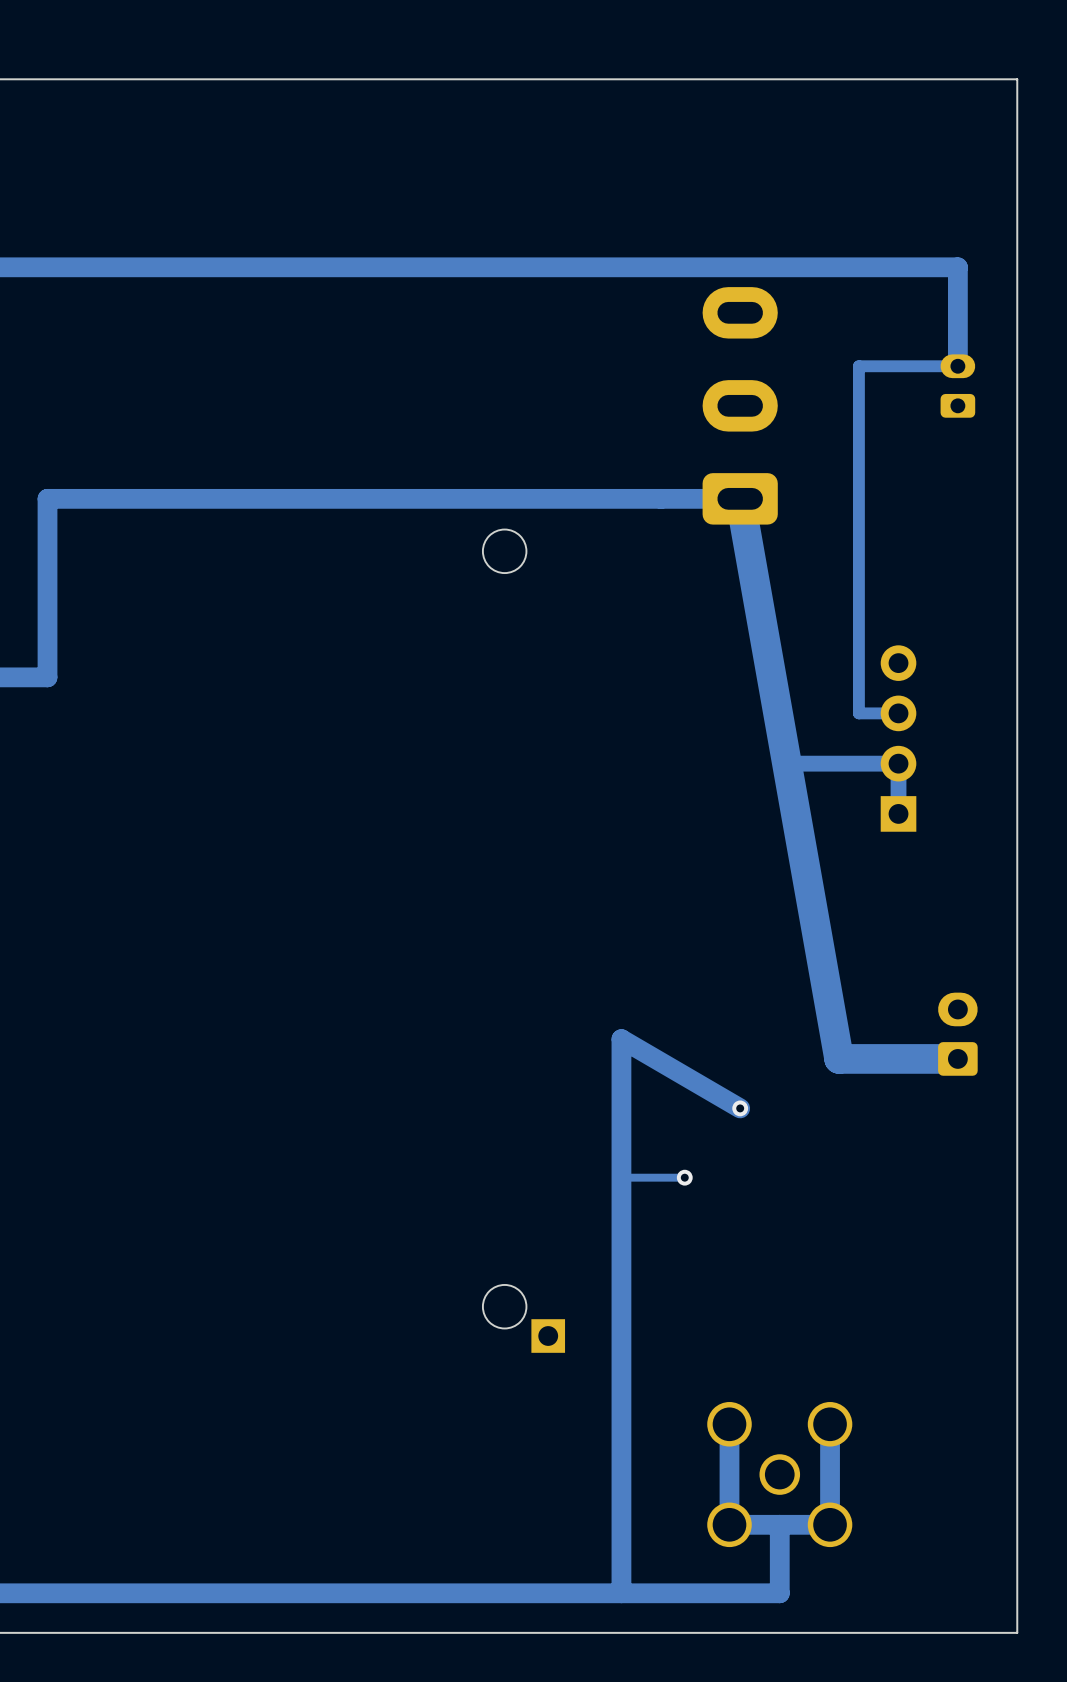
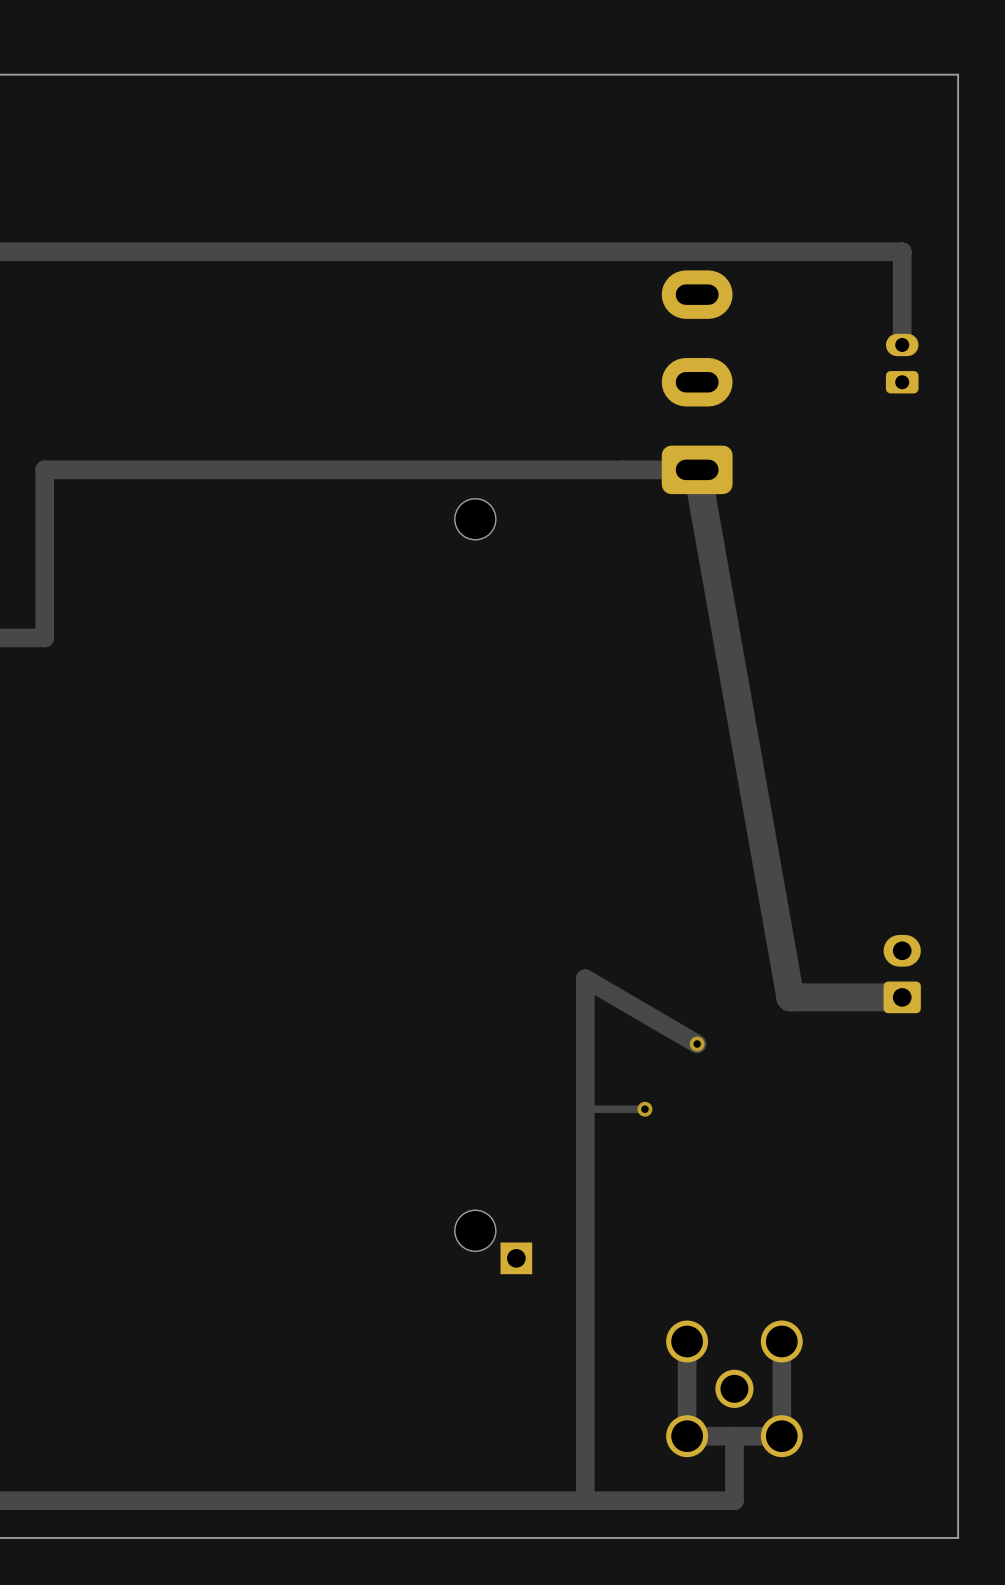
track: (957, 366) (858, 366) (858, 713) (898, 713) -> none
part: (898, 738) -> none
track: (786, 763) (898, 763) (898, 813) -> none

